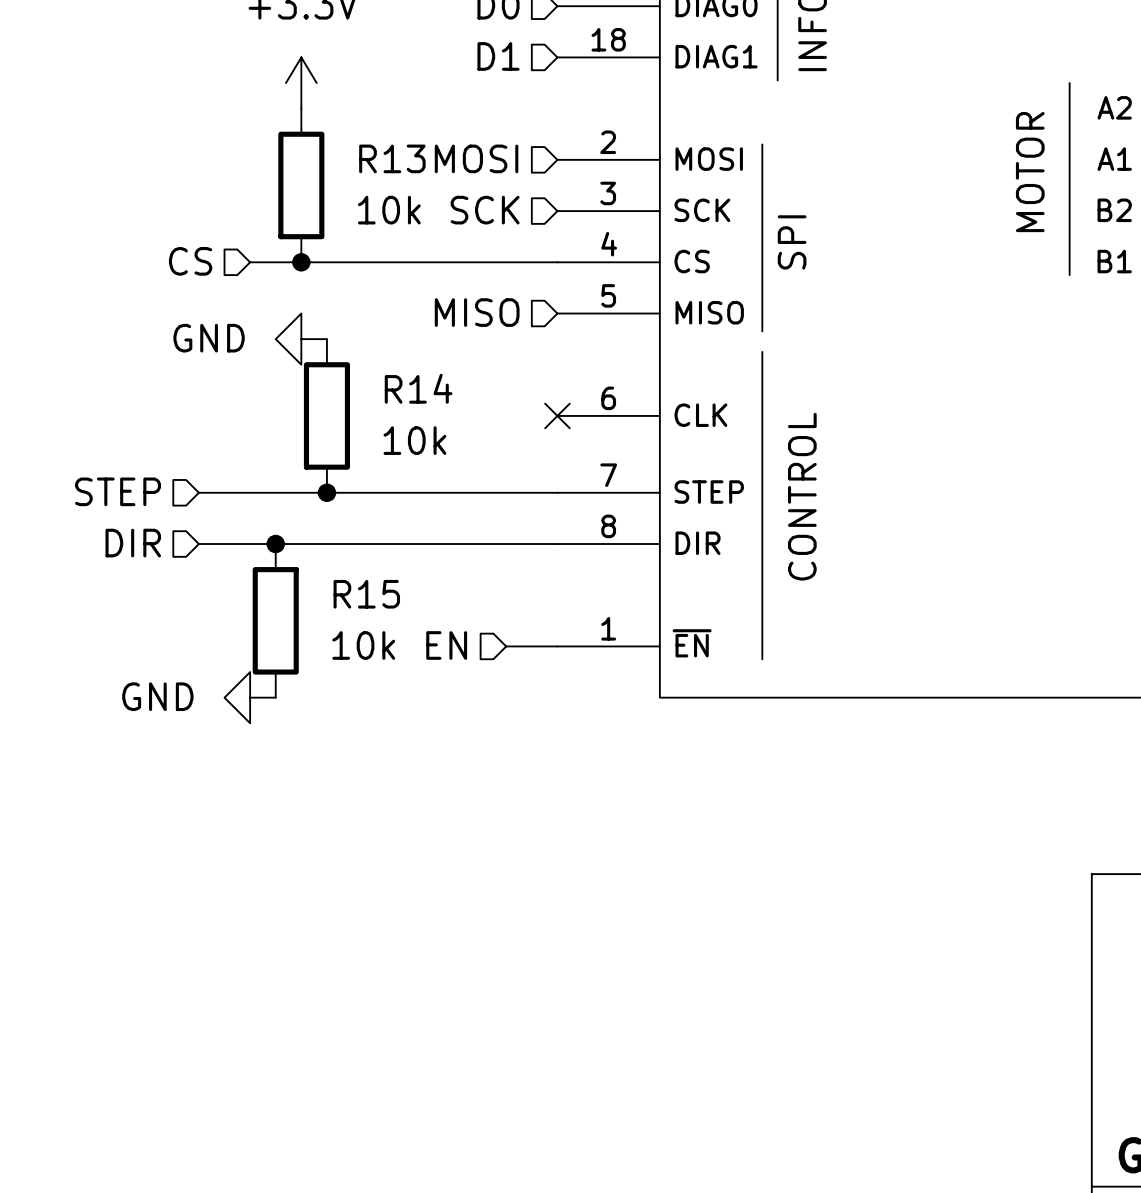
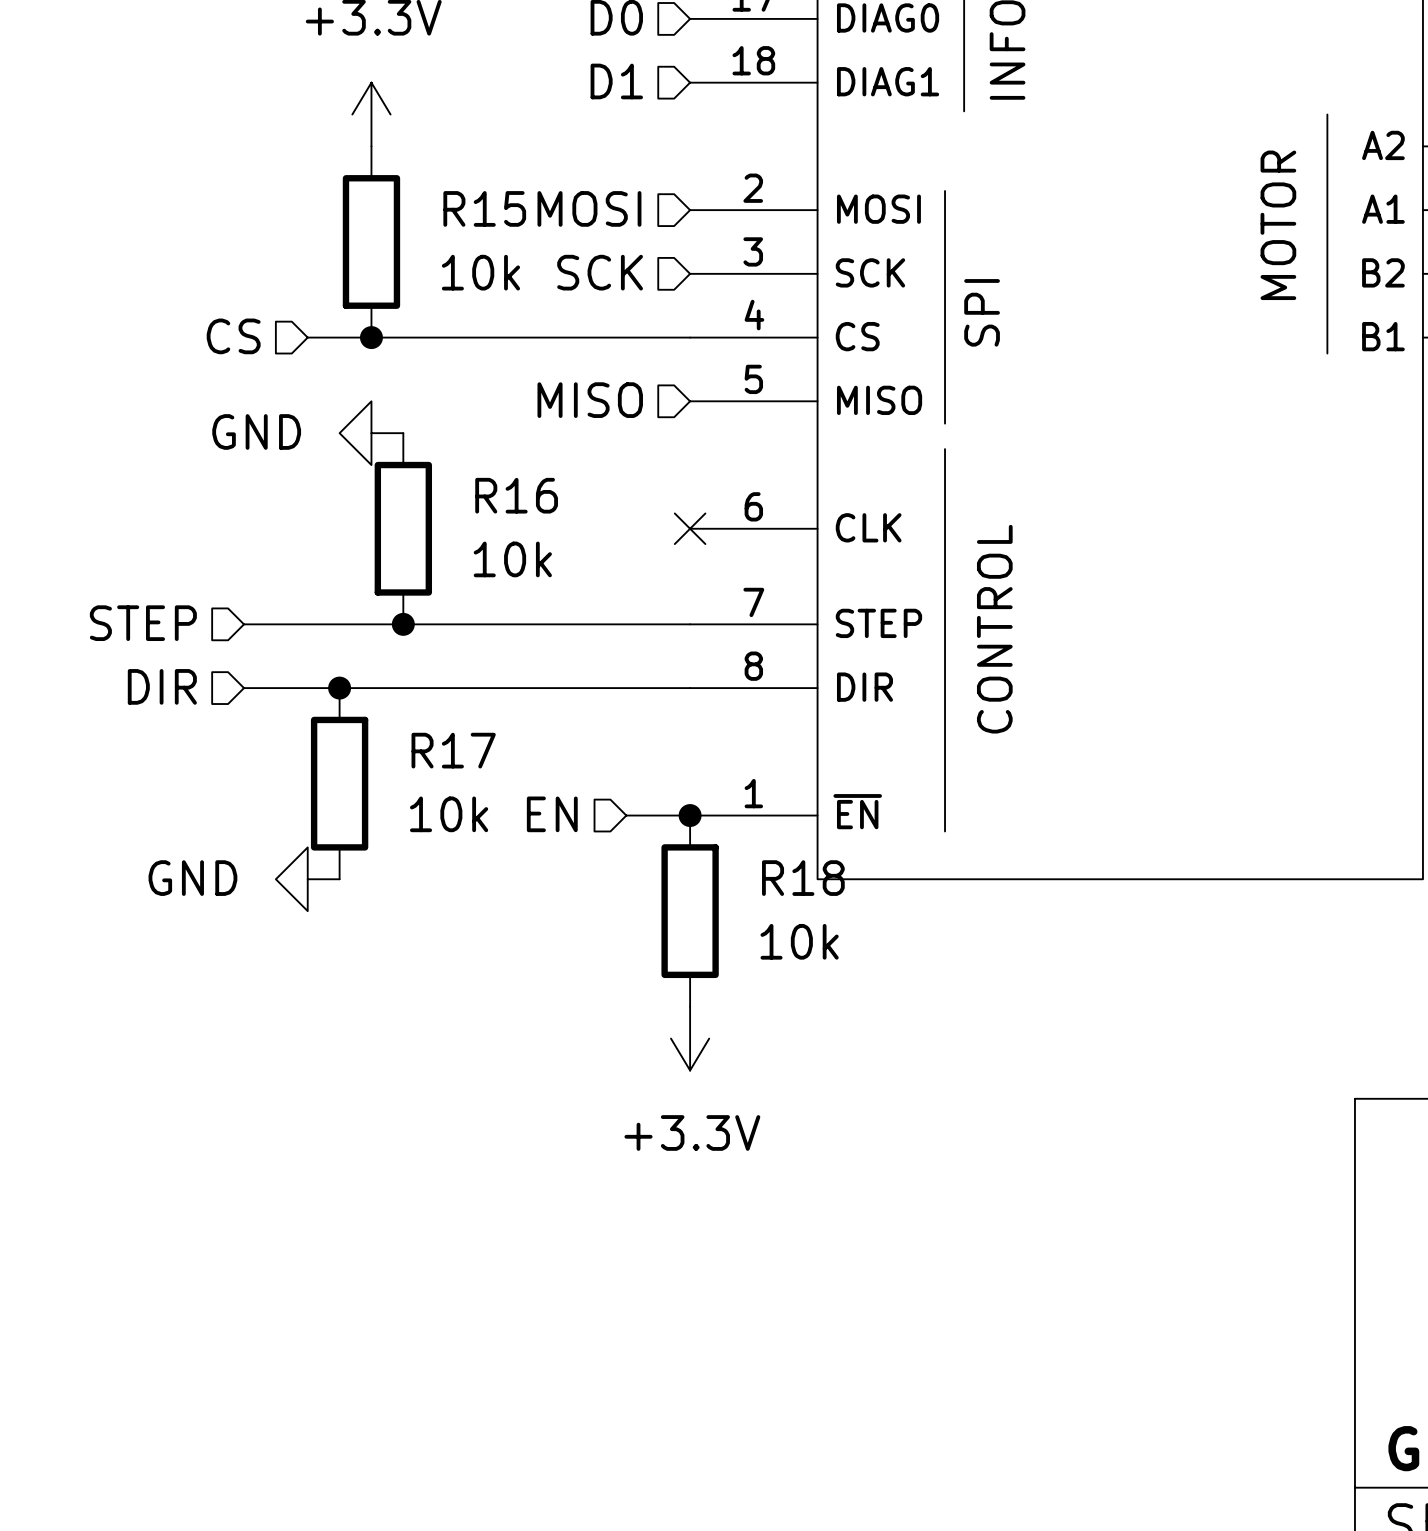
R13 name: R13 (392, 158) -> R15 (484, 208)
R14 name: R14 (418, 388) -> R16 (516, 495)
R15 name: R15 (366, 594) -> R17 (453, 750)
junction: none -> (690, 815)
R18: none -> 10k (690, 911)
power symbol: none -> +3.3V (690, 1038)

